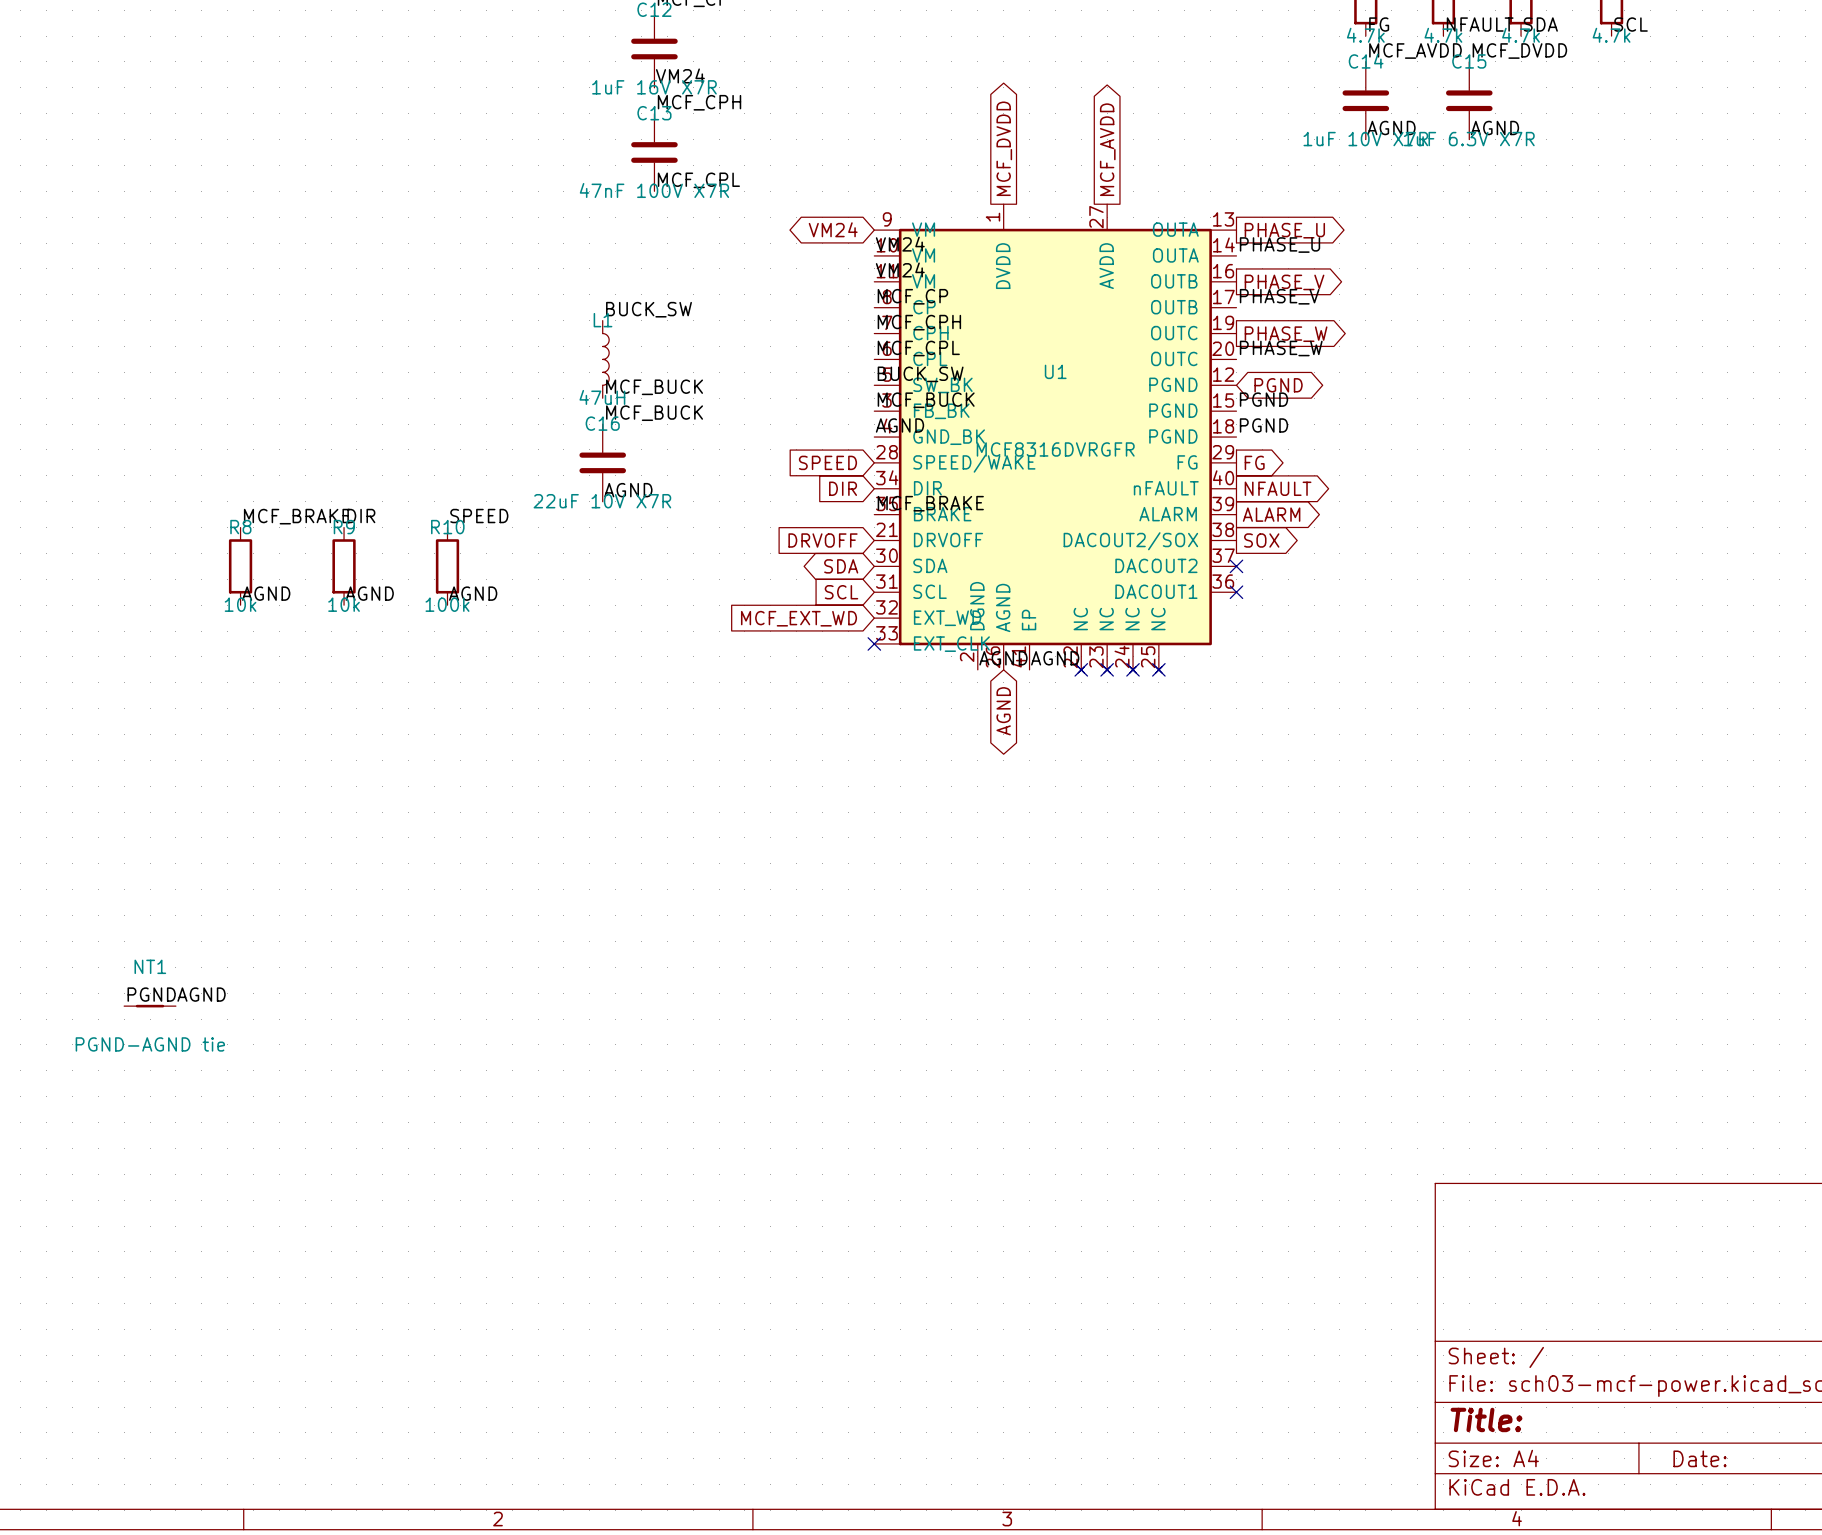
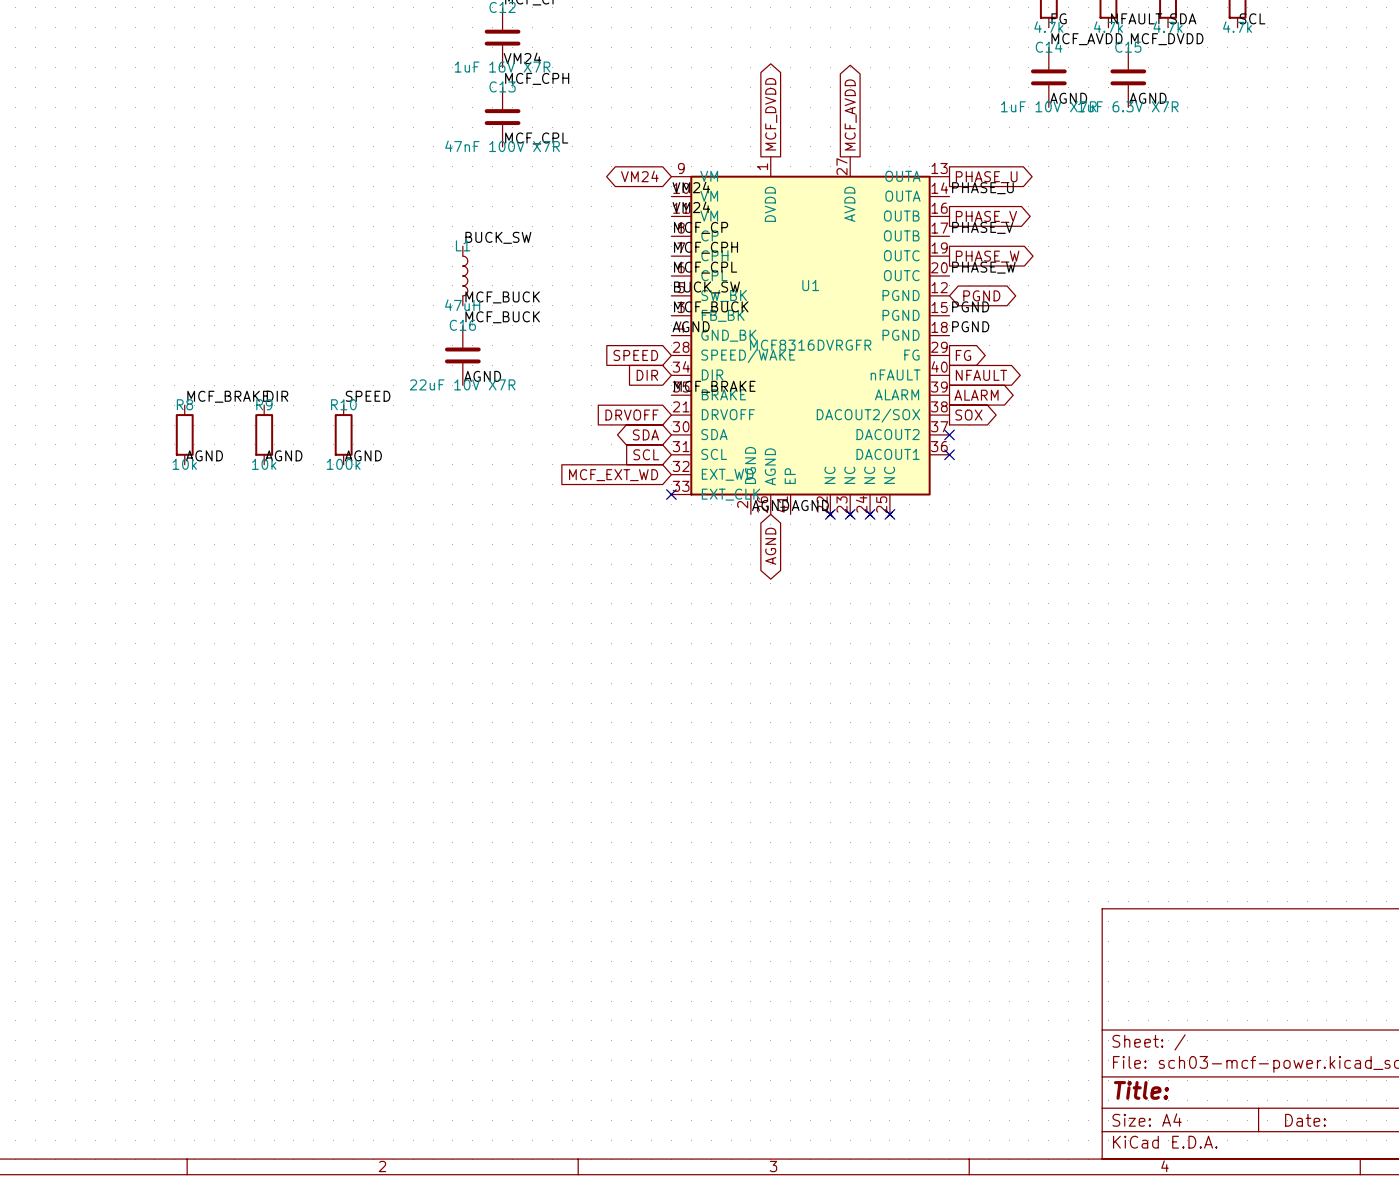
label: PGND (151, 994) -> none
label: AGND (201, 994) -> none
NT1: PGND-AGND tie (150, 1006) -> none

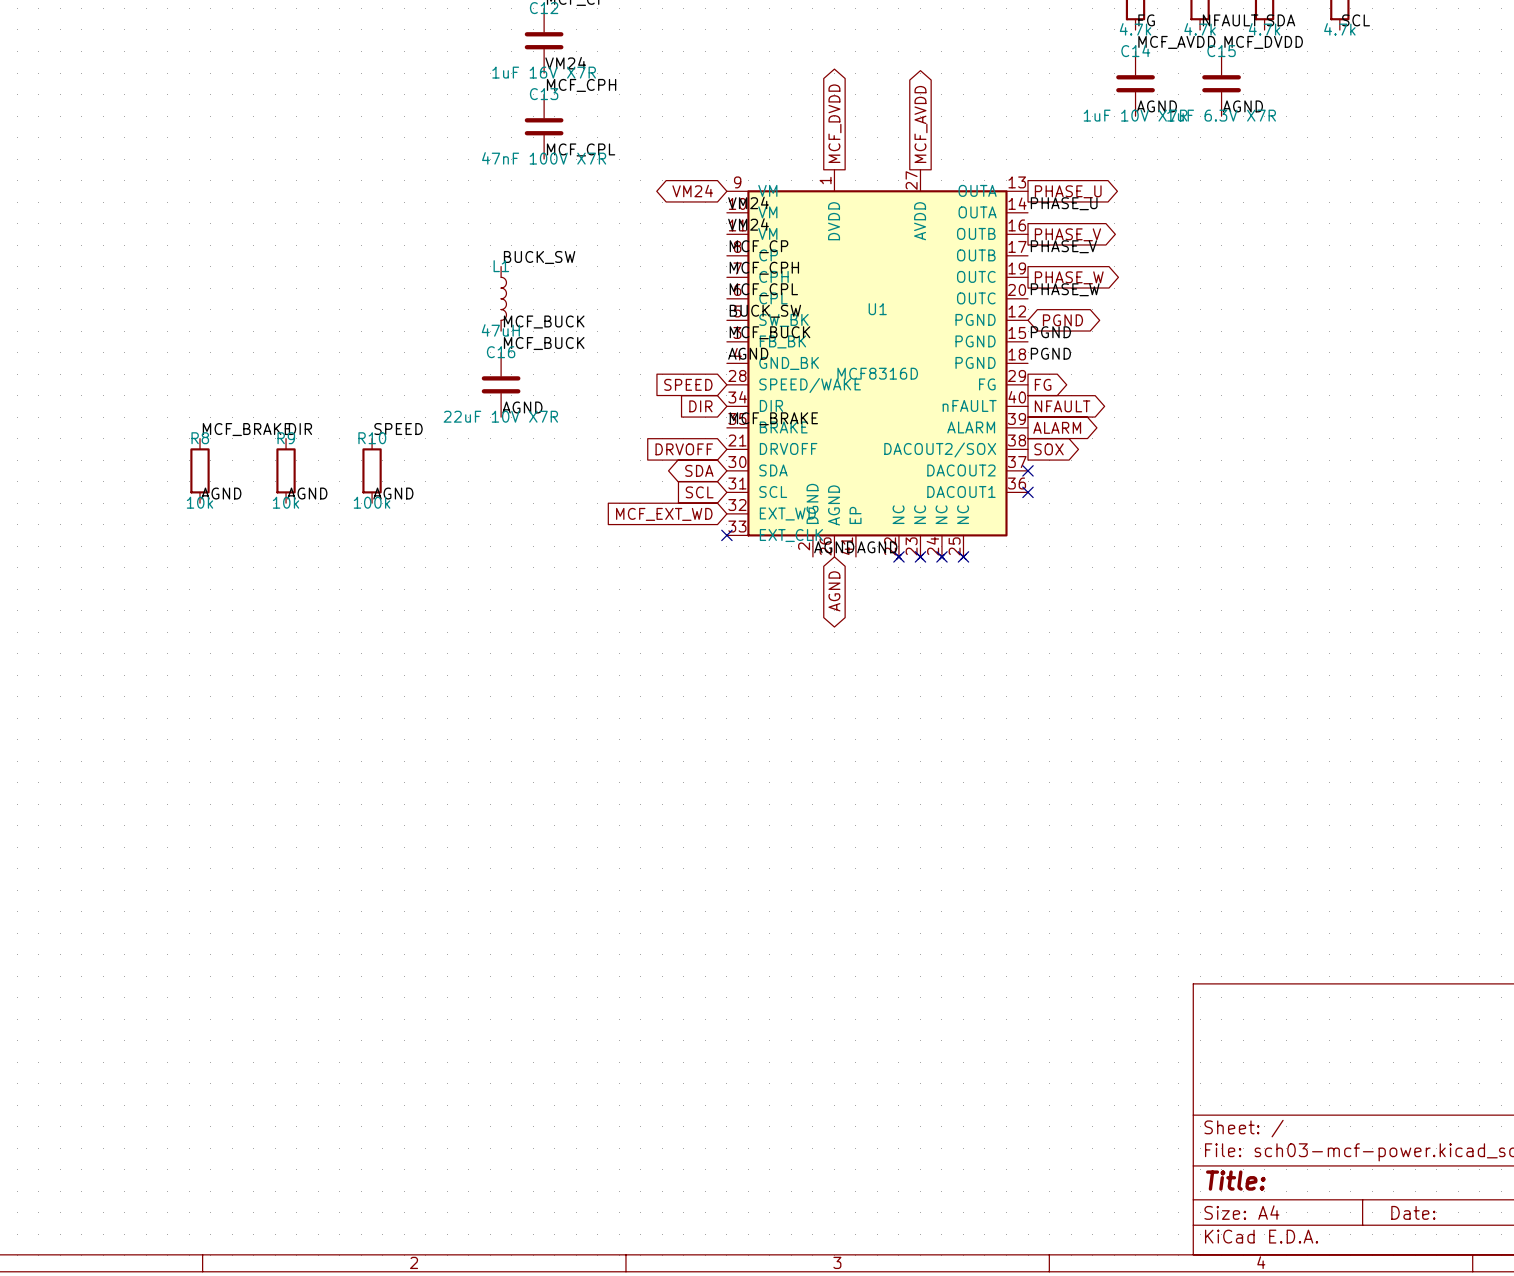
U1 value: MCF8316DVRGFR (810, 345) -> MCF8316D (877, 373)

